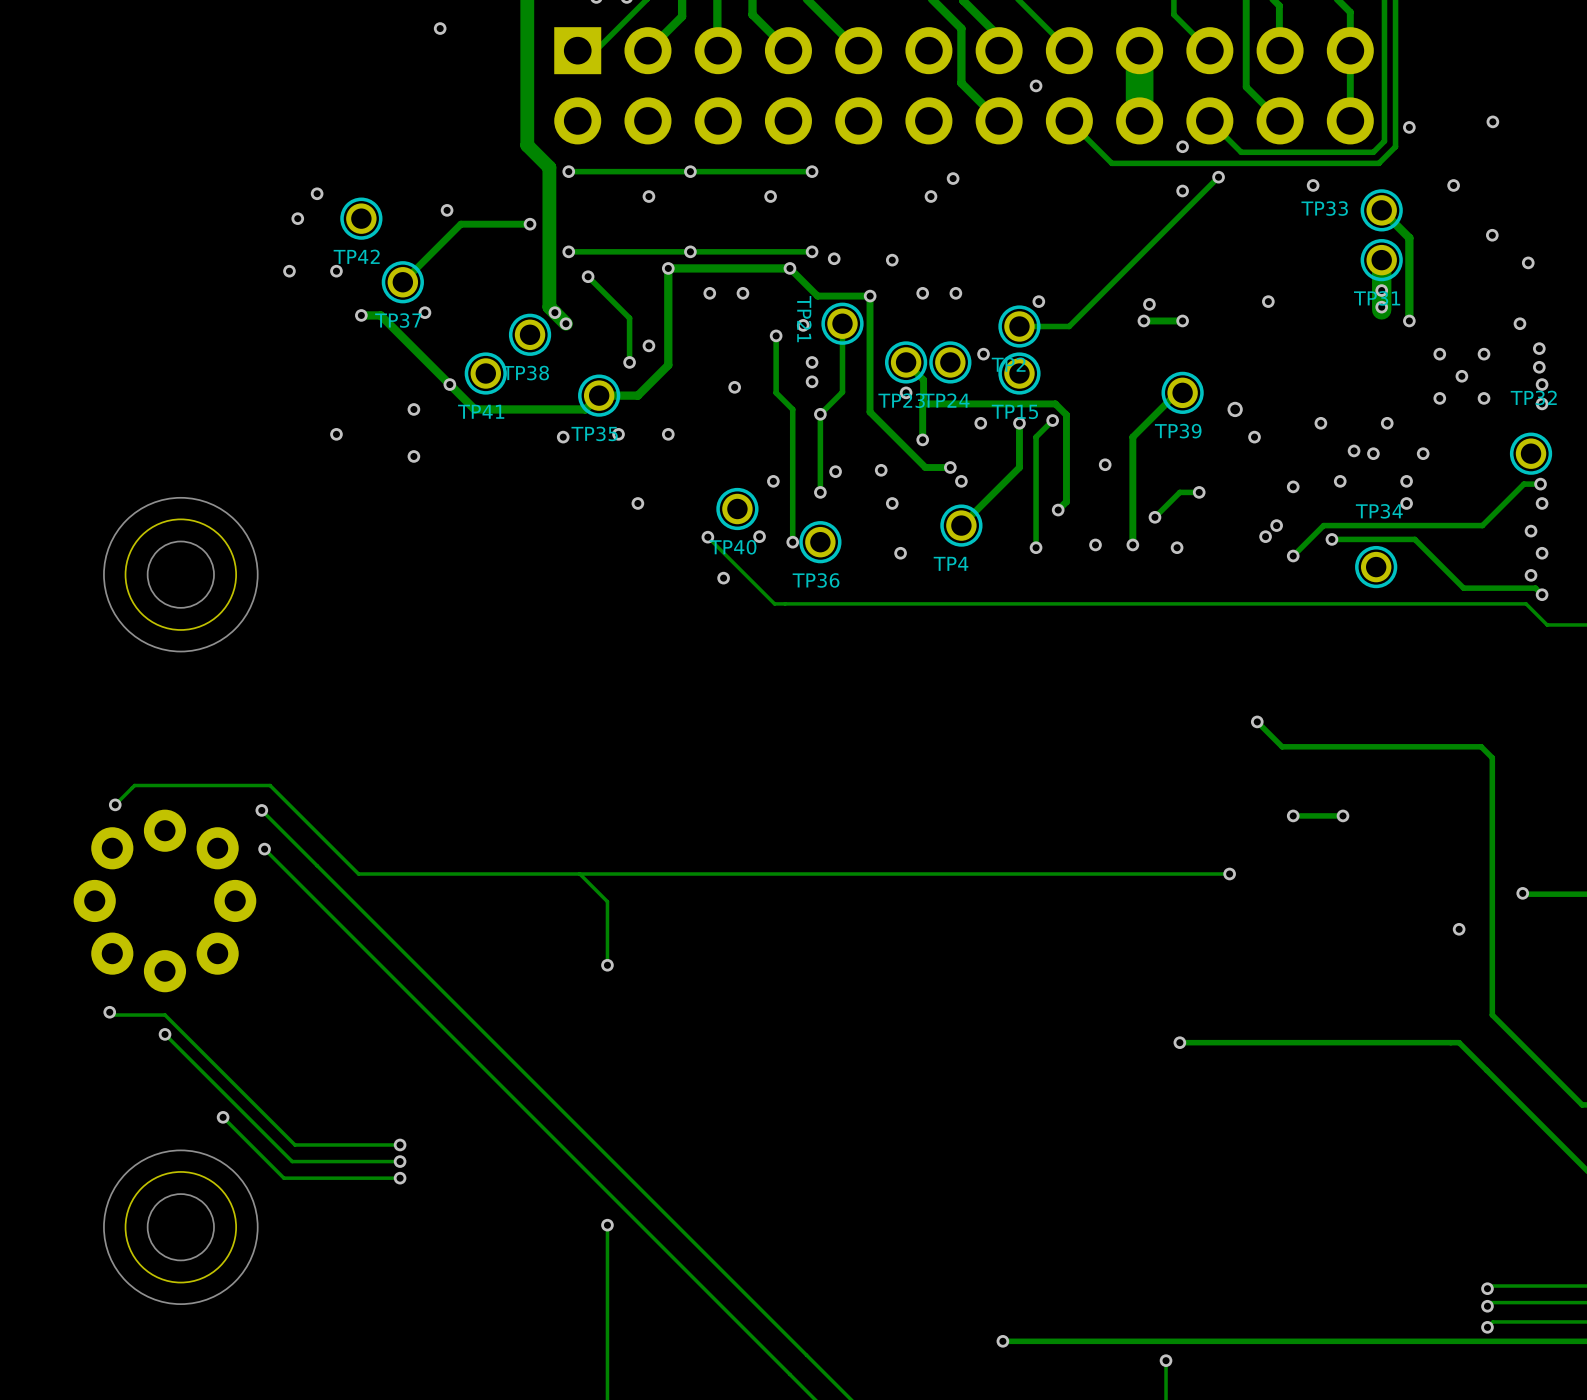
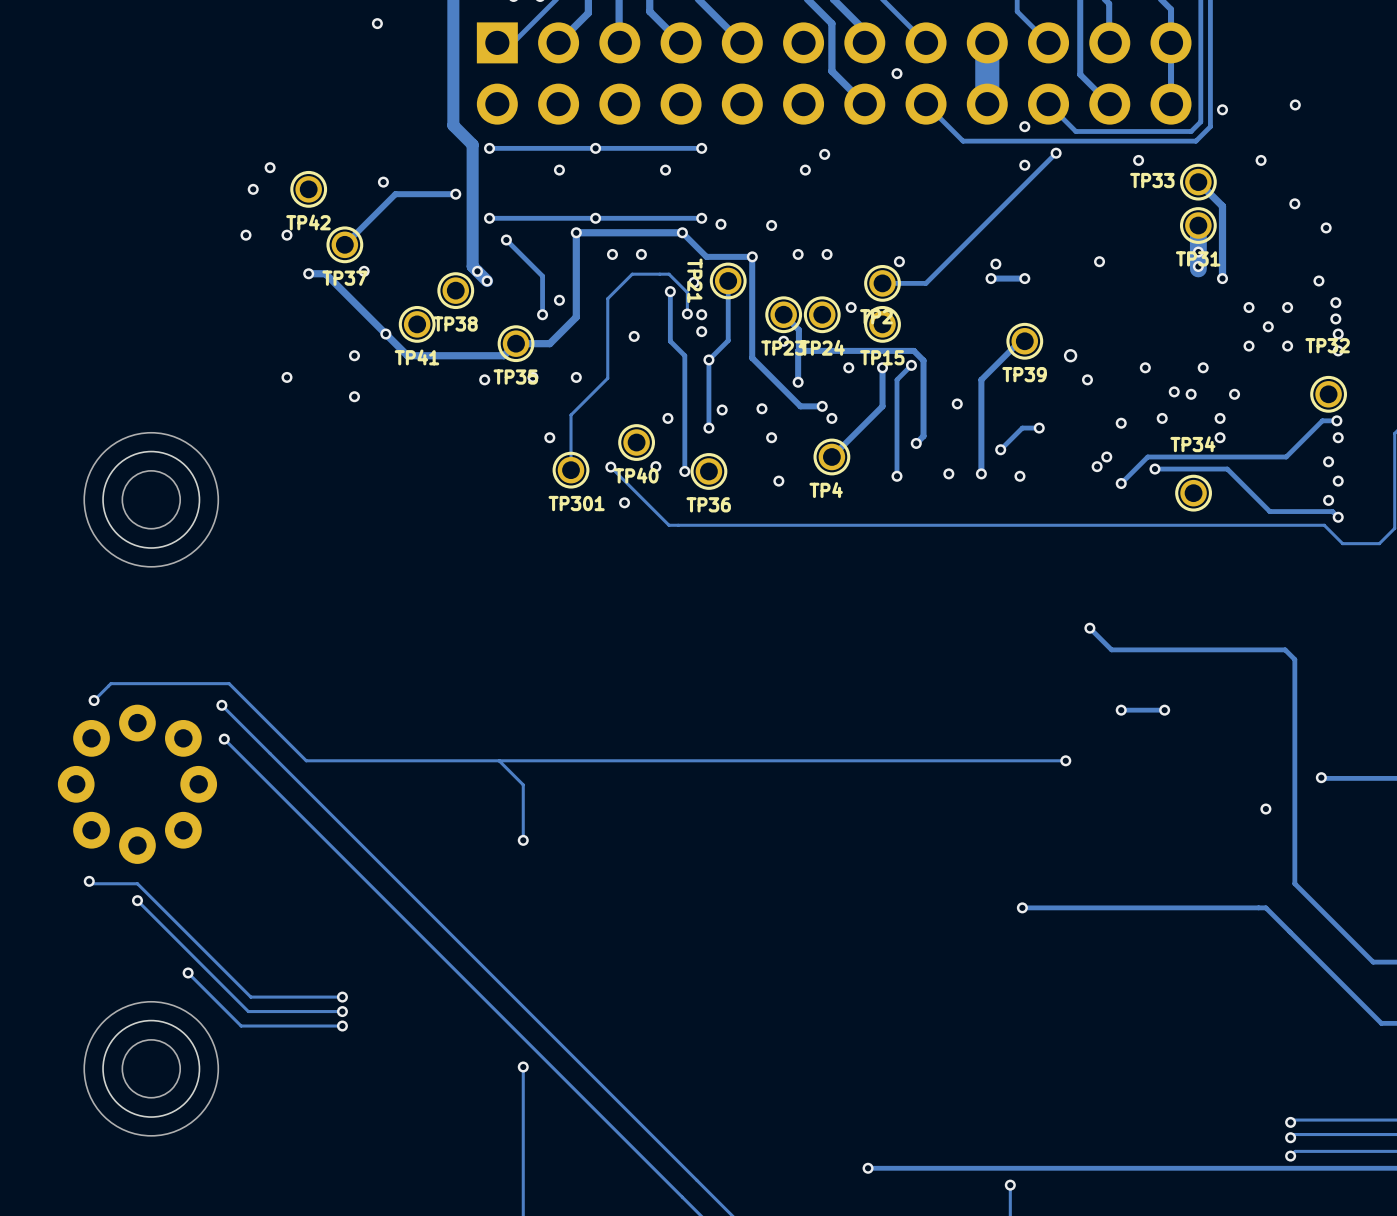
track: none -> (687, 313) (687, 292) (669, 274) (632, 274) (607, 298) (607, 378) (571, 415) (571, 470)
via: none -> (687, 313)
TP301: none -> (571, 470)

